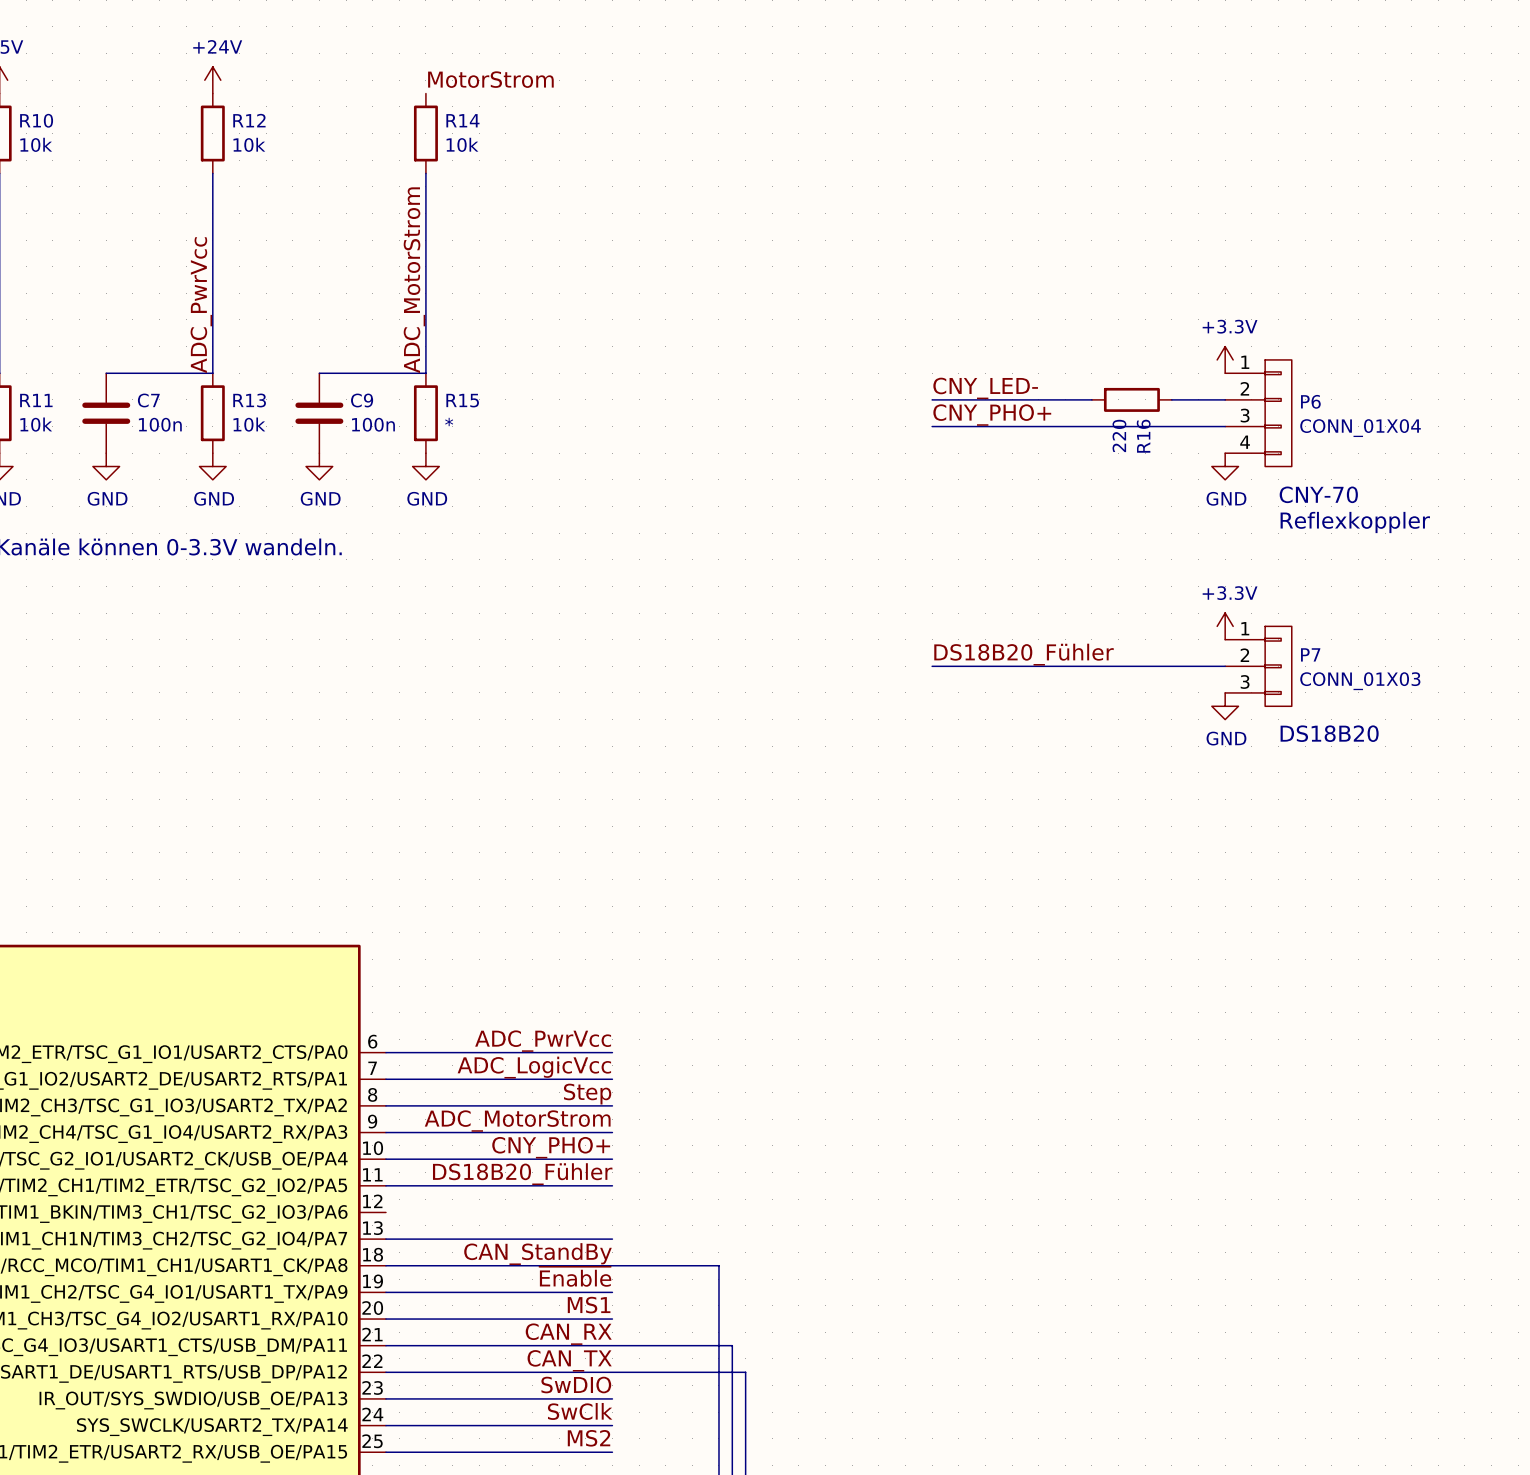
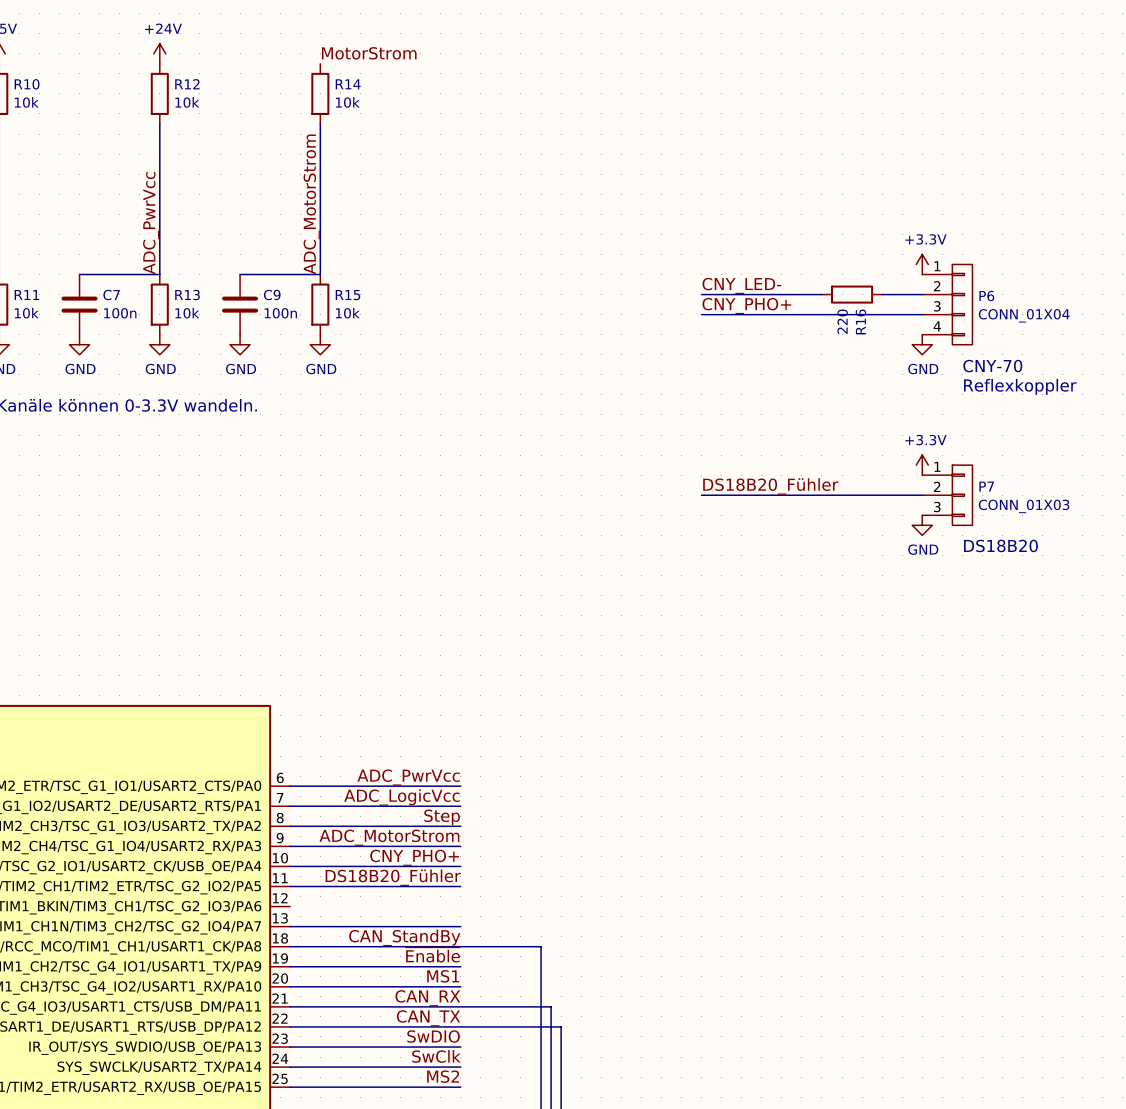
R15 value: * (449, 421) -> 10k (347, 313)

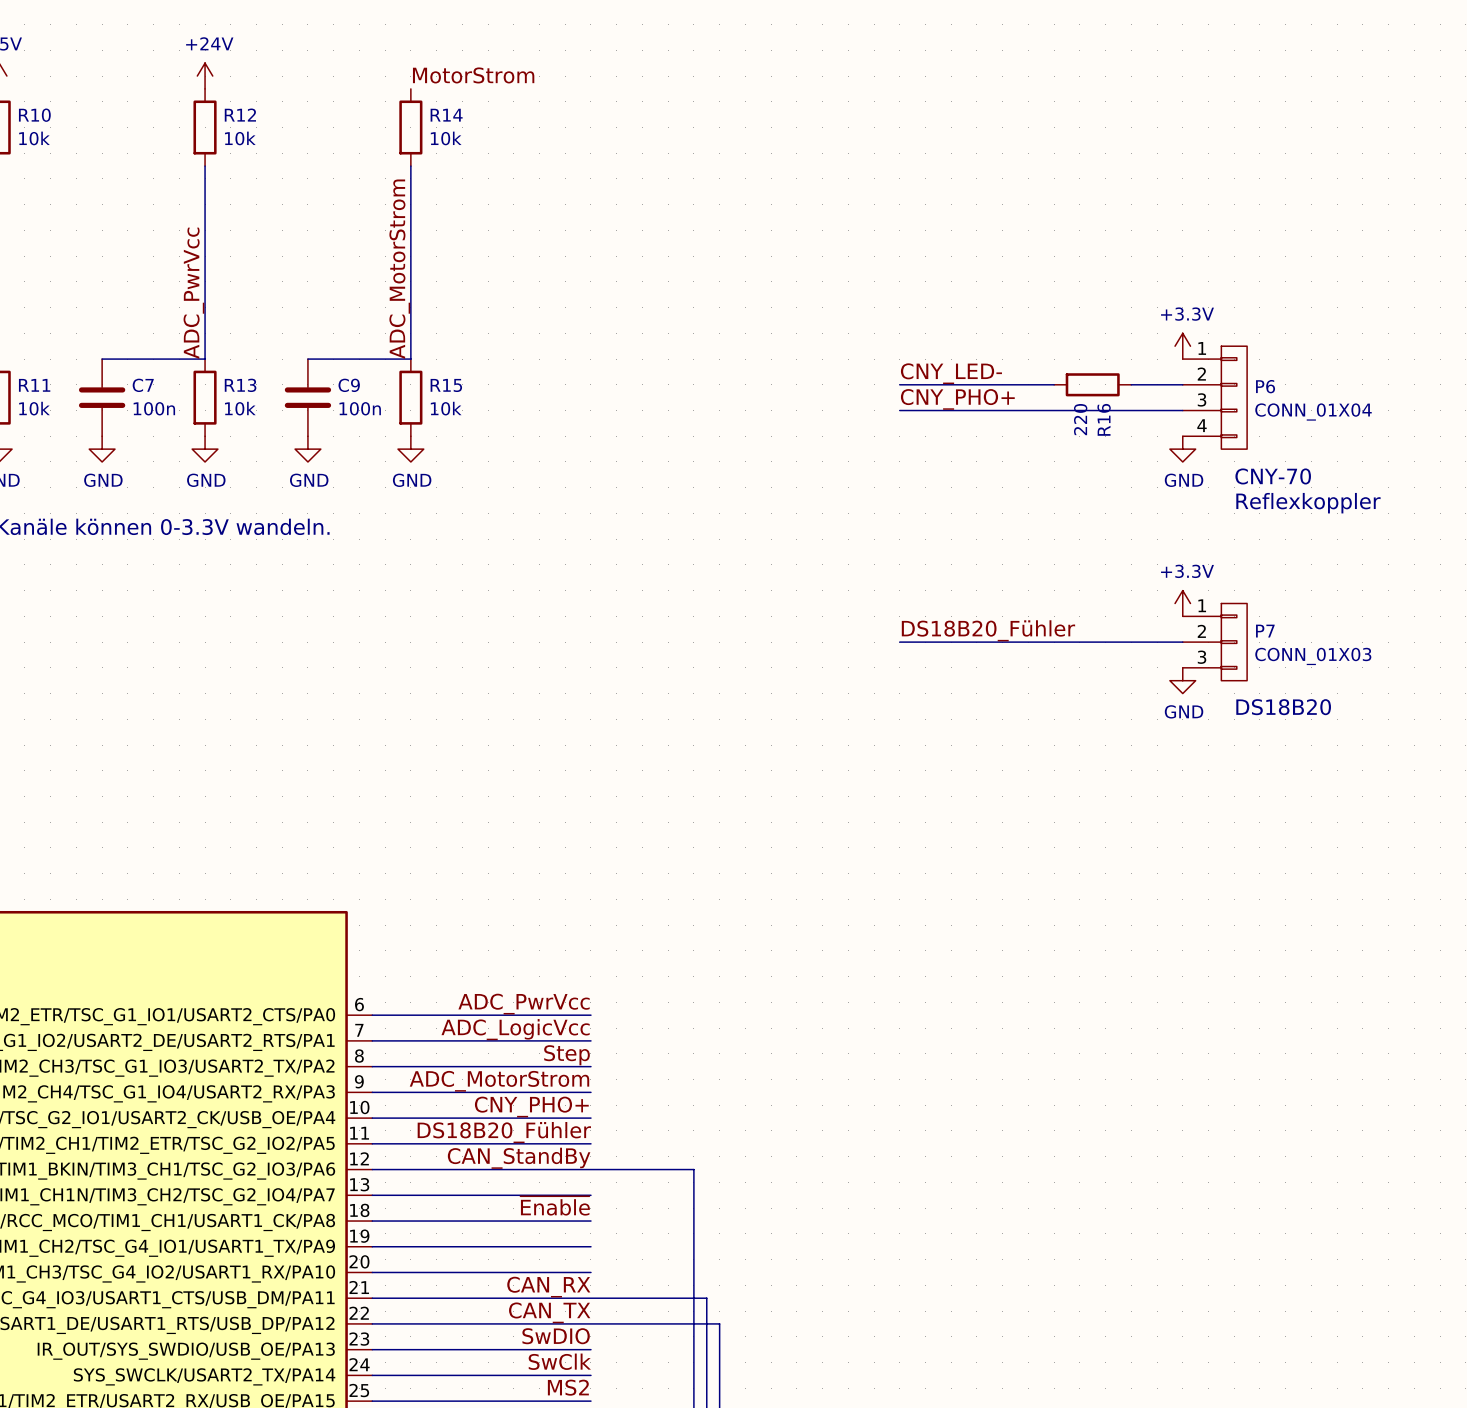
label: none -> CAN_StandBy (519, 1158)
label: CAN_StandBy (404, 937) -> ~{Enable} (555, 1205)
wire: (460, 946) (541, 946) -> (372, 1169) (693, 1169) (693, 1221)
label: ~{Enable} (432, 954) -> none
label: MS1 (443, 976) -> none

